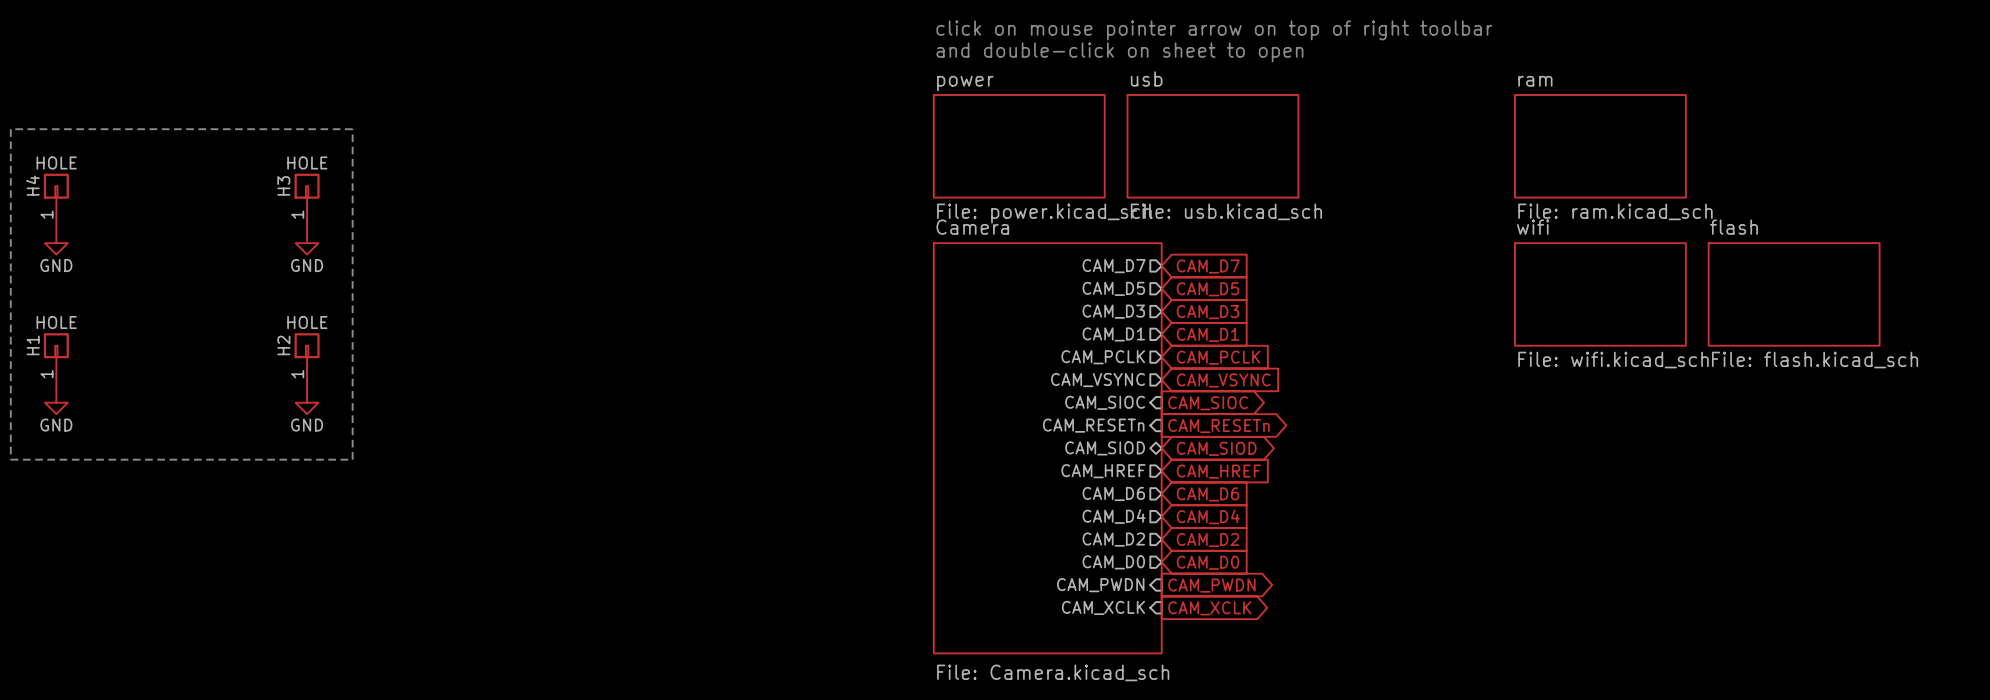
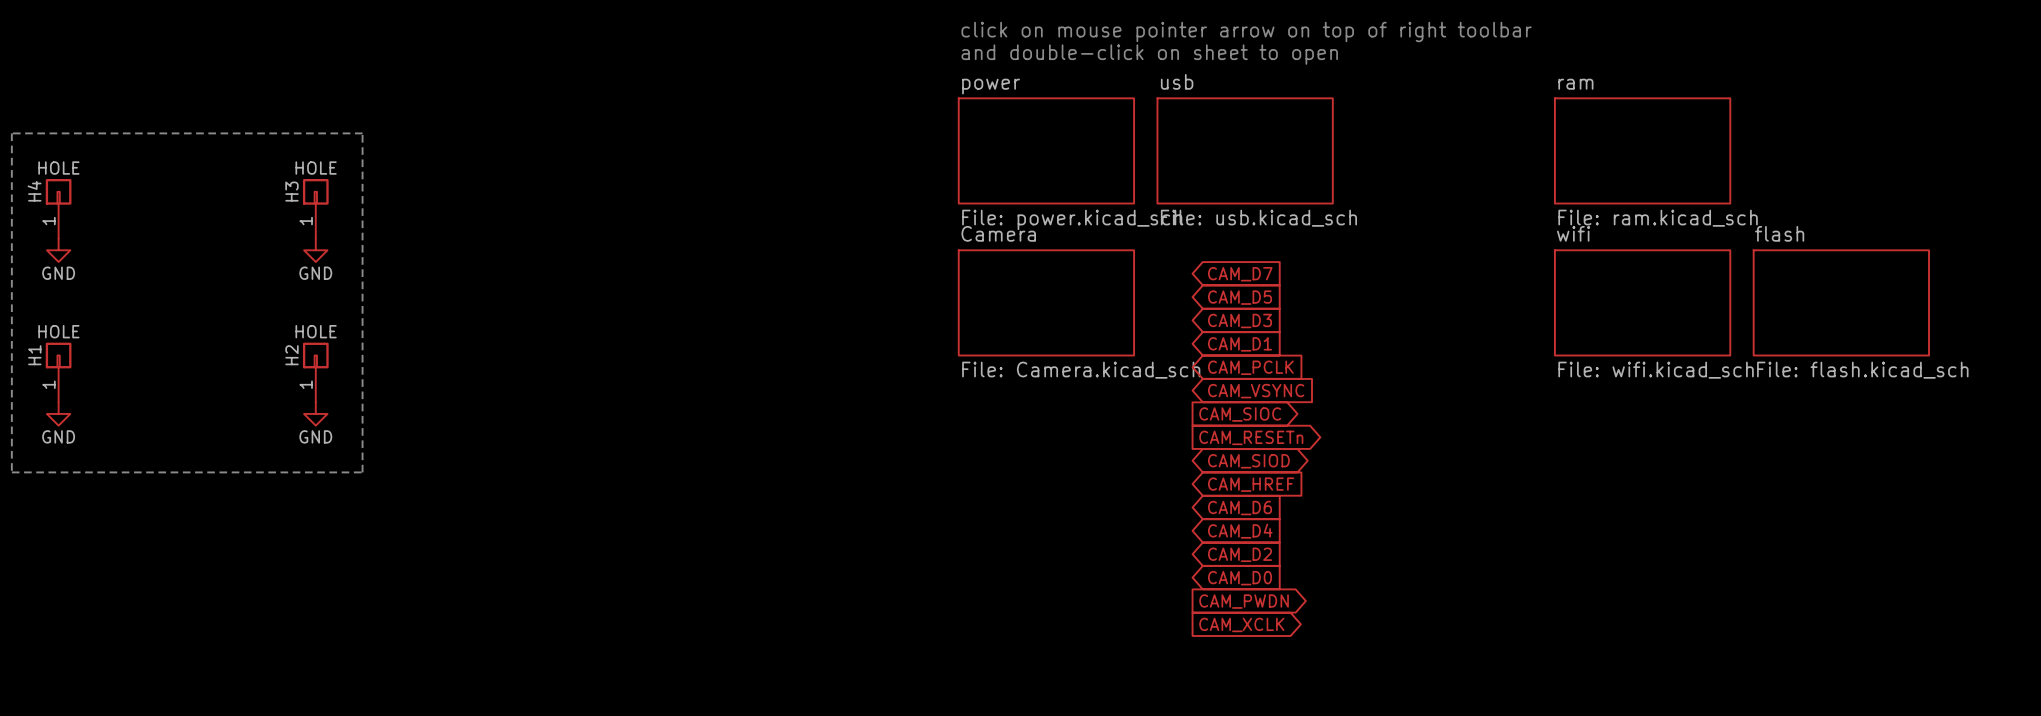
sheet pin: CAM_D7 (1114, 266) -> none
sheet pin: CAM_D5 (1113, 288) -> none
sheet Camera: none -> File: Camera.kicad_sch (1046, 302)
sheet pin: CAM_D3 (1113, 311) -> none
sheet pin: CAM_D1 (1113, 334) -> none
sheet pin: CAM_PCLK (1103, 357) -> none
sheet pin: CAM_VSYNC (1098, 380) -> none
sheet pin: CAM_SIOC (1105, 402) -> none
sheet pin: CAM_RESETn (1093, 425) -> none
sheet Camera: File: Camera.kicad_sch (1047, 448) -> none
sheet pin: CAM_SIOD (1105, 448) -> none
sheet pin: CAM_HREF (1103, 471) -> none
sheet pin: CAM_D6 (1113, 493) -> none
sheet pin: CAM_D4 (1114, 516) -> none
sheet pin: CAM_D2 (1113, 539) -> none
sheet pin: CAM_D0 (1113, 562) -> none
sheet pin: CAM_PWDN (1100, 585) -> none
sheet pin: CAM_XCLK (1103, 607) -> none

